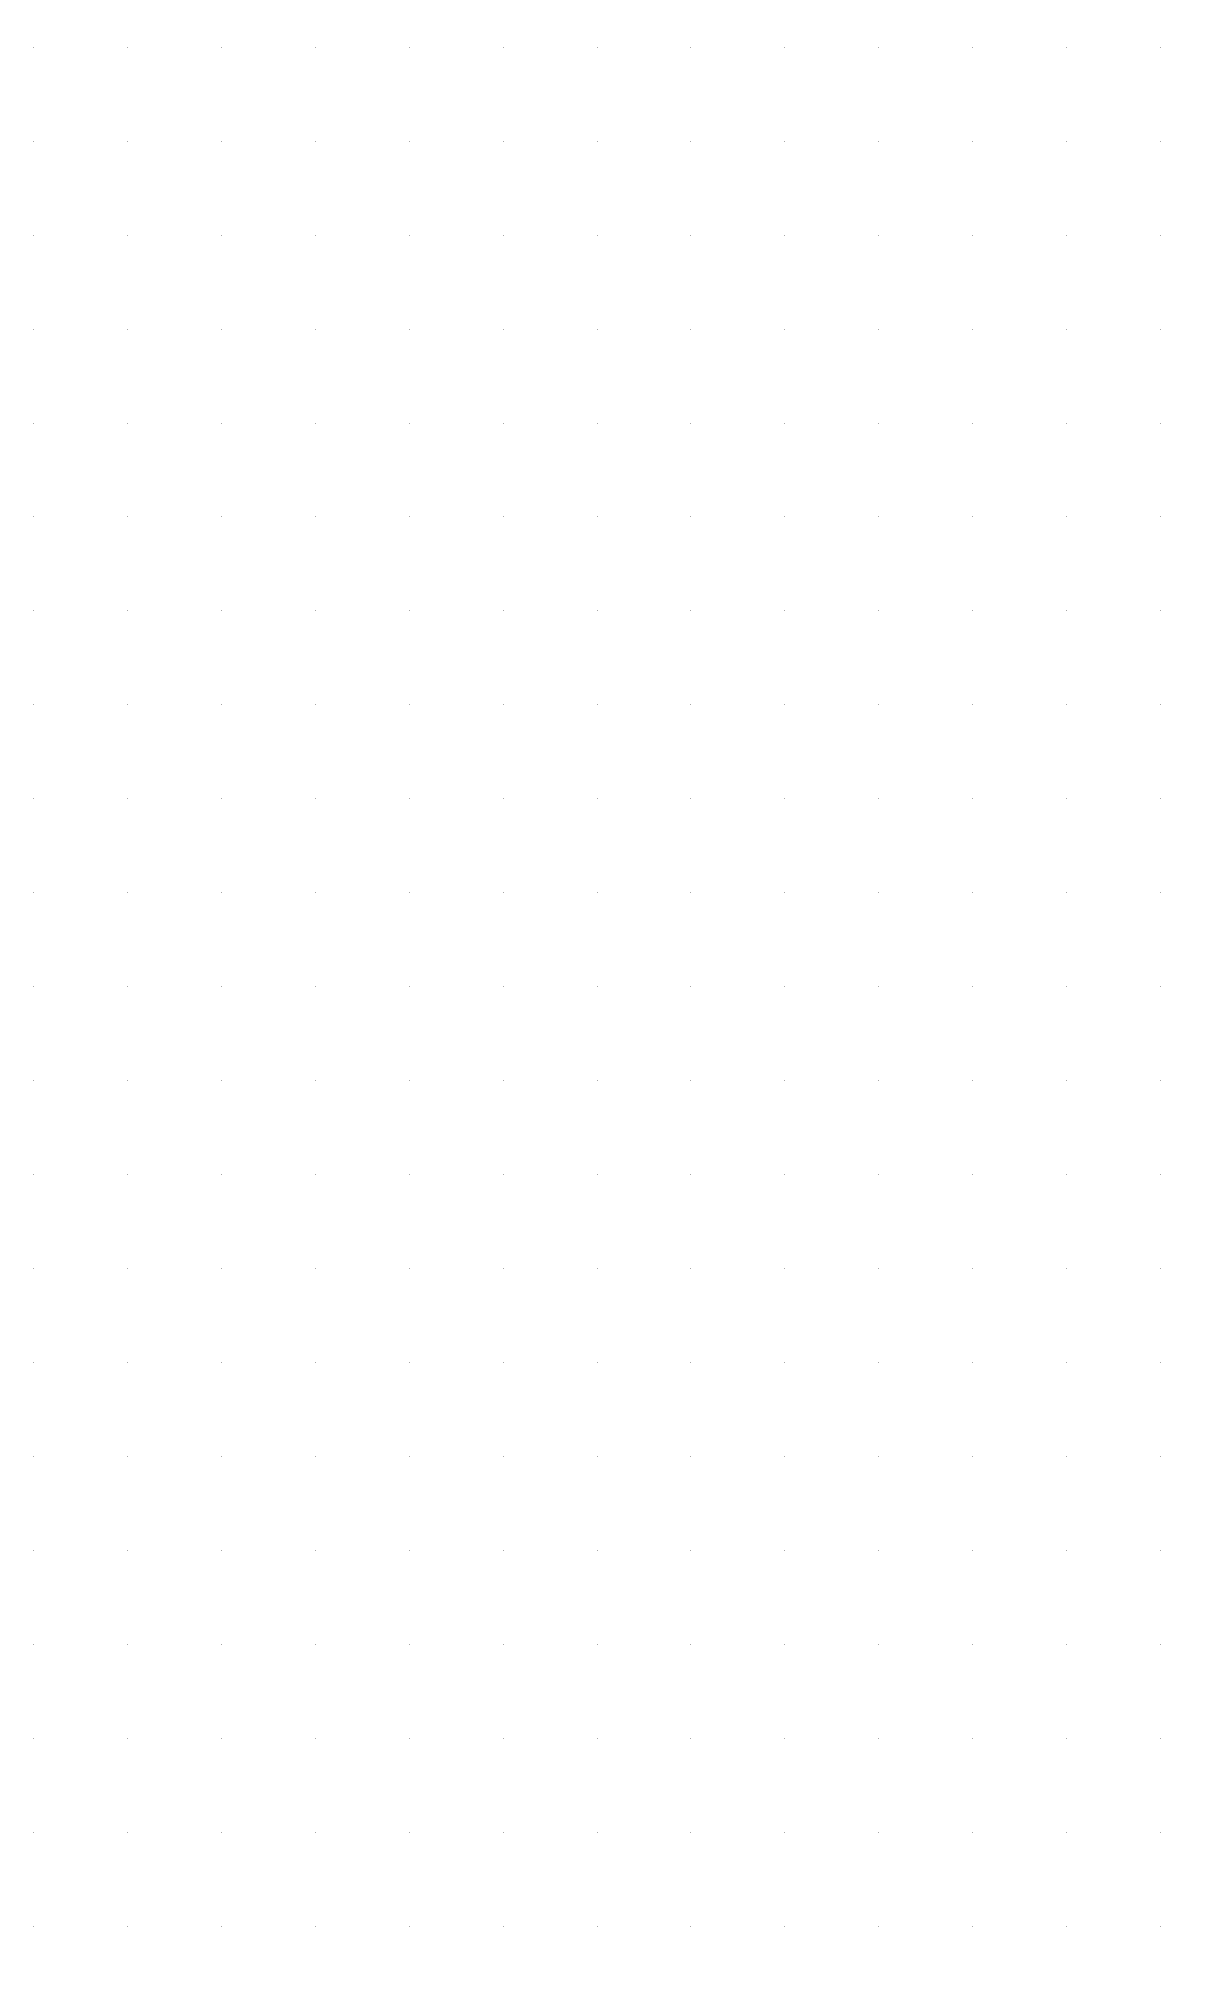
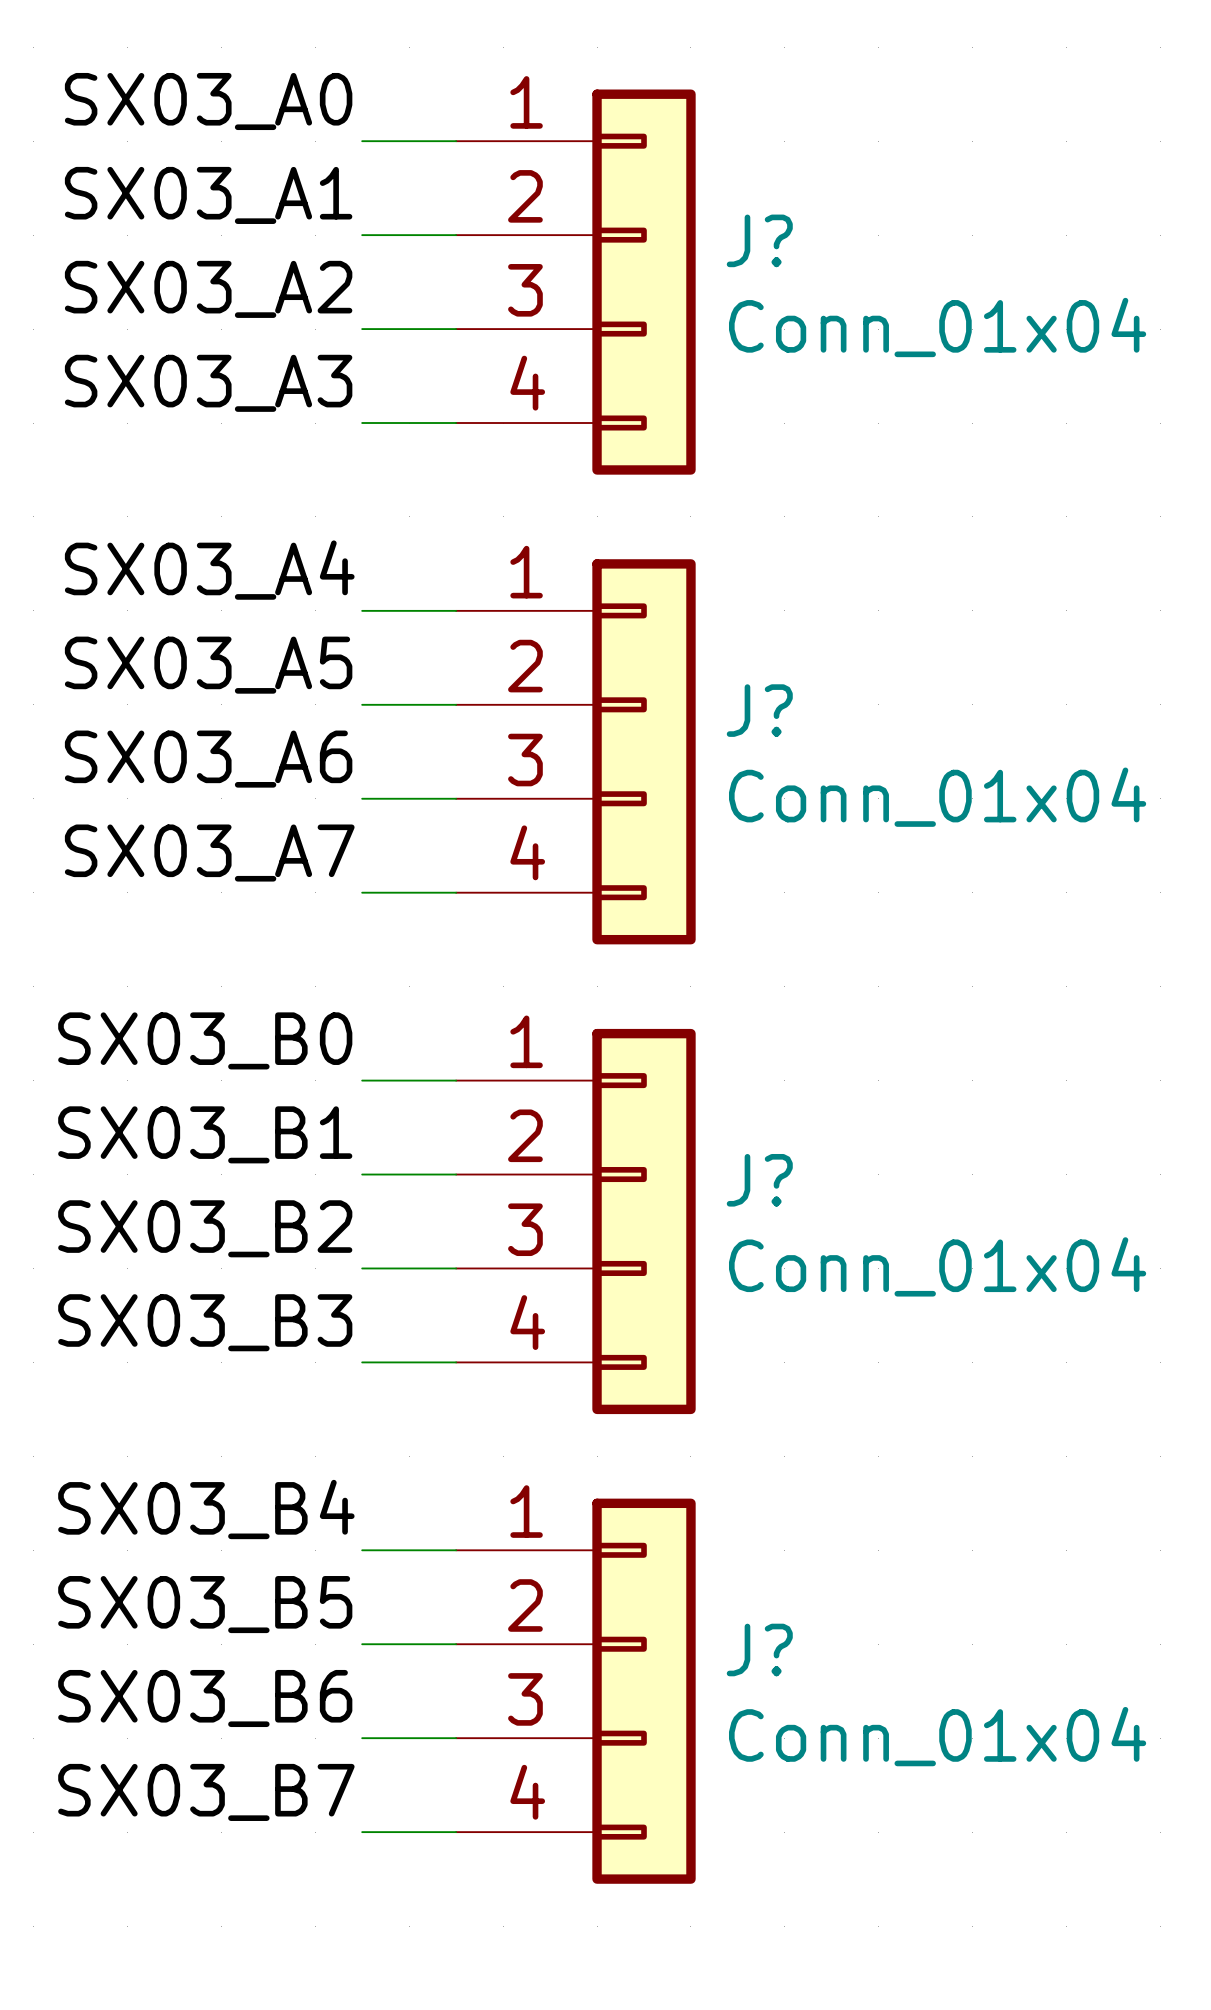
label: none -> SX03_A0 (208, 101)
wire: none -> (362, 141) (456, 141)
label: none -> SX03_A1 (208, 195)
wire: none -> (362, 235) (456, 235)
J?: none -> Conn_01x04 (575, 282)
label: none -> SX03_A2 (208, 289)
wire: none -> (362, 329) (456, 329)
label: none -> SX03_A3 (208, 383)
wire: none -> (362, 423) (456, 423)
label: none -> SX03_A4 (209, 570)
wire: none -> (362, 610) (456, 610)
label: none -> SX03_A5 (208, 665)
wire: none -> (362, 704) (456, 704)
J?: none -> Conn_01x04 (575, 751)
label: none -> SX03_A6 (208, 759)
wire: none -> (362, 798) (456, 798)
label: none -> SX03_A7 (209, 853)
wire: none -> (362, 892) (456, 892)
label: none -> SX03_B0 (205, 1040)
wire: none -> (362, 1080) (456, 1080)
label: none -> SX03_B1 (205, 1134)
wire: none -> (362, 1174) (456, 1174)
J?: none -> Conn_01x04 (575, 1221)
label: none -> SX03_B2 (205, 1228)
wire: none -> (362, 1268) (456, 1268)
label: none -> SX03_B3 (205, 1322)
wire: none -> (362, 1362) (456, 1362)
label: none -> SX03_B4 (206, 1509)
wire: none -> (362, 1550) (456, 1550)
label: none -> SX03_B5 (205, 1604)
wire: none -> (362, 1644) (456, 1644)
J?: none -> Conn_01x04 (575, 1691)
label: none -> SX03_B6 (205, 1698)
wire: none -> (362, 1738) (456, 1738)
label: none -> SX03_B7 (206, 1792)
wire: none -> (362, 1832) (456, 1832)

